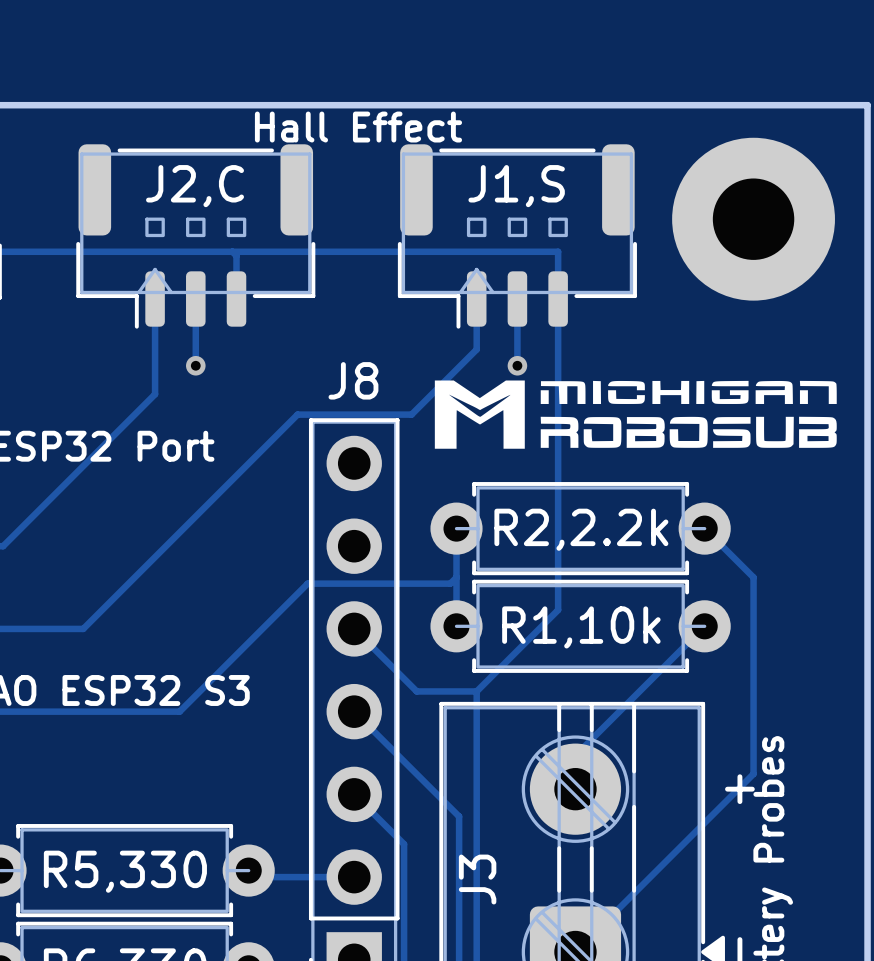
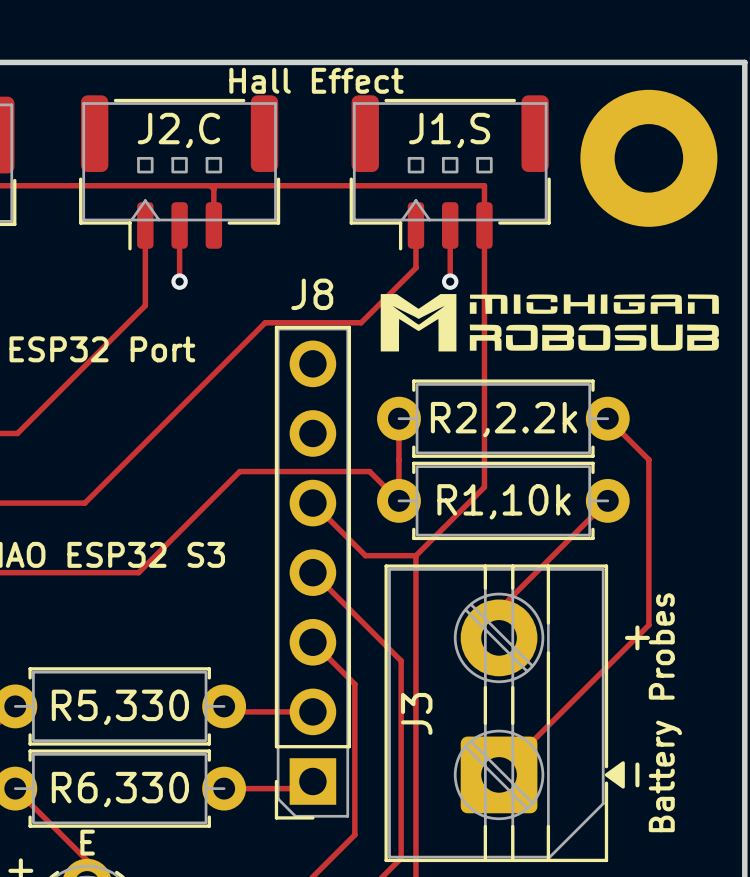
track: (456, 577) (450, 583) (307, 583) (179, 711) (147, 711) -> (398, 500) (369, 471) (239, 471) (138, 572)

